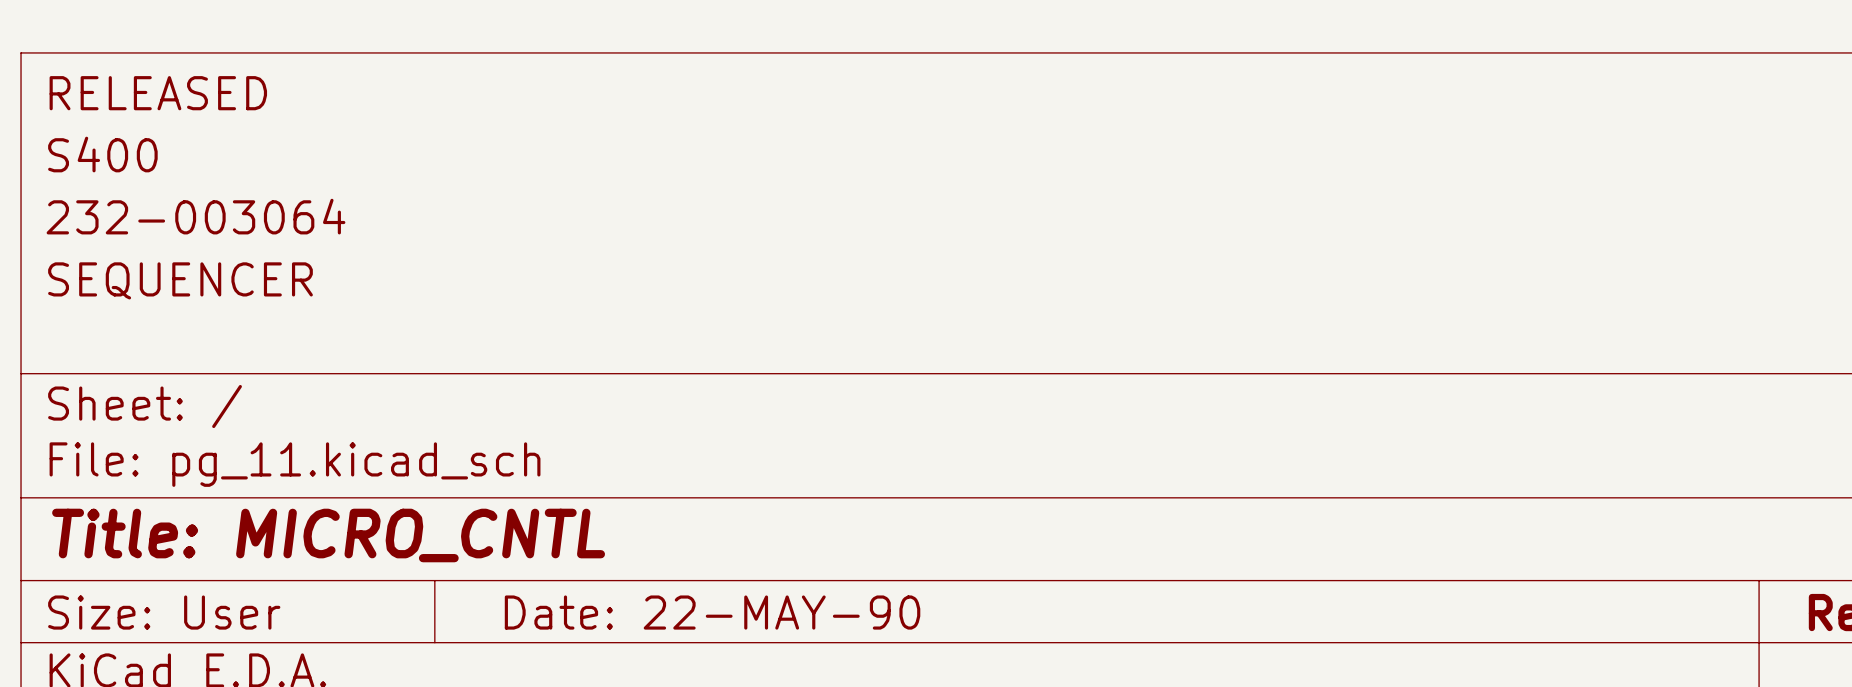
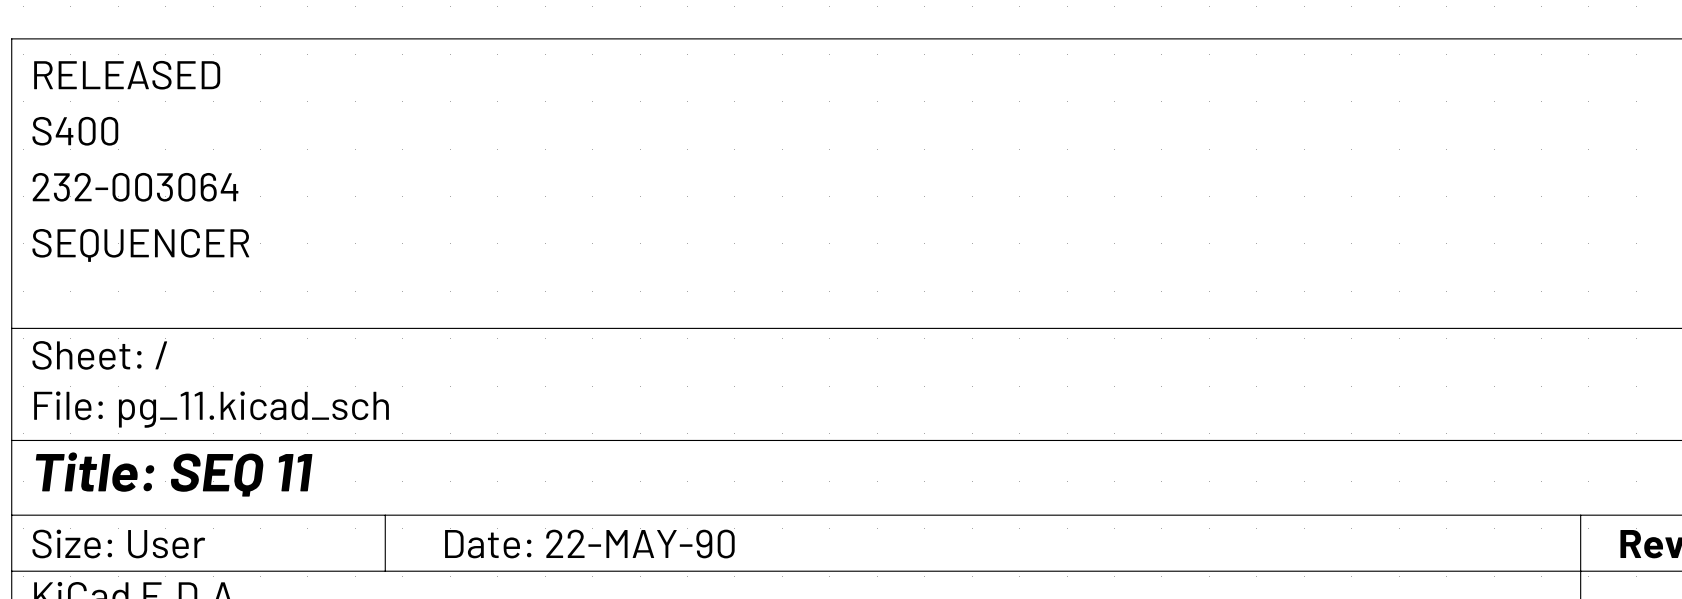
title block: Title: MICRO_CNTL (328, 535) -> Title: SEQ 11 (174, 474)

